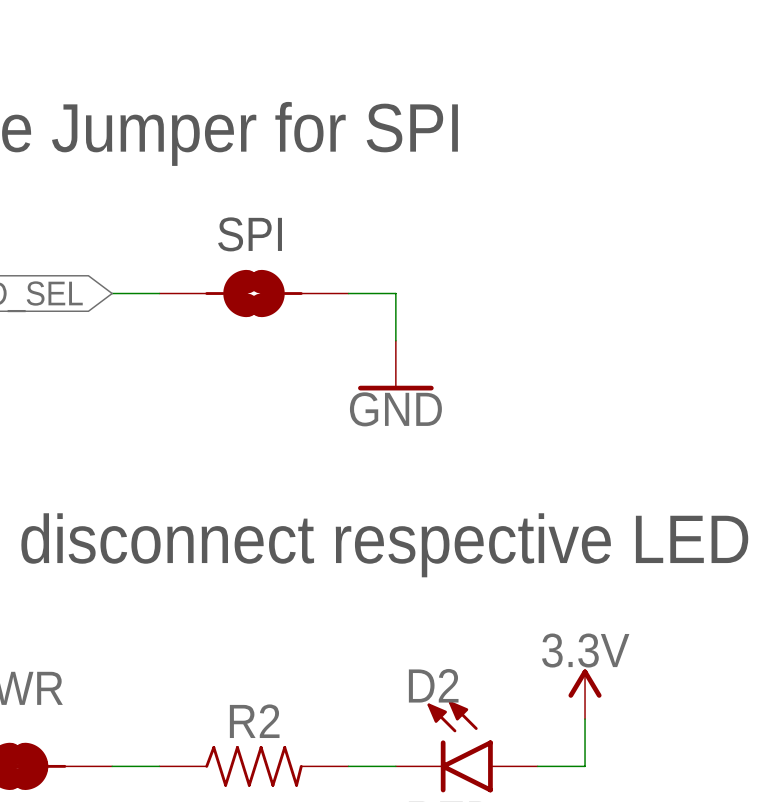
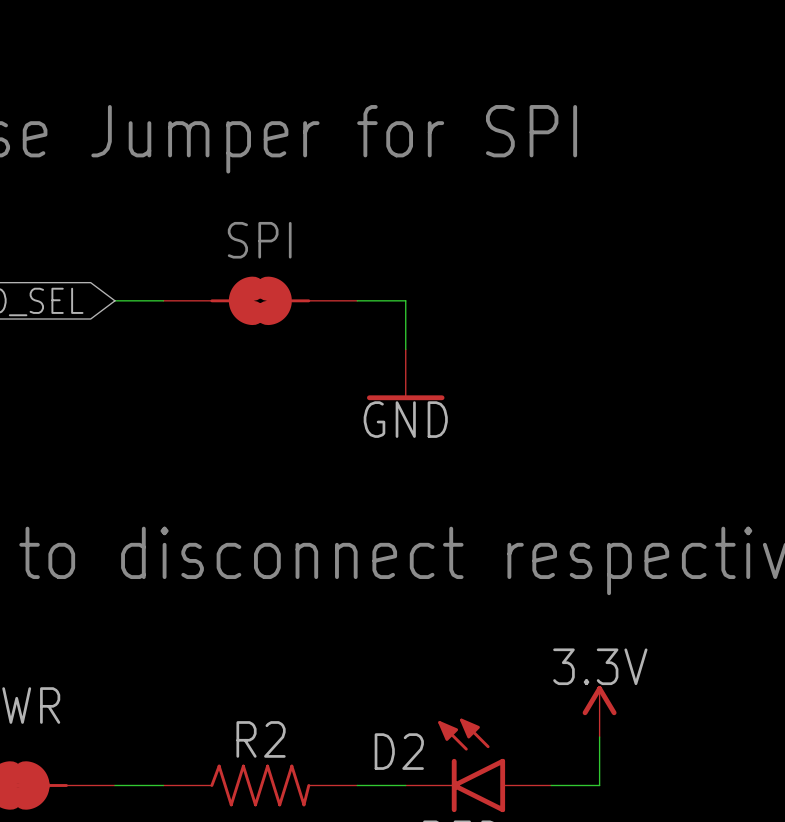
D2 name position: D2 (433, 685) -> D2 (399, 751)

